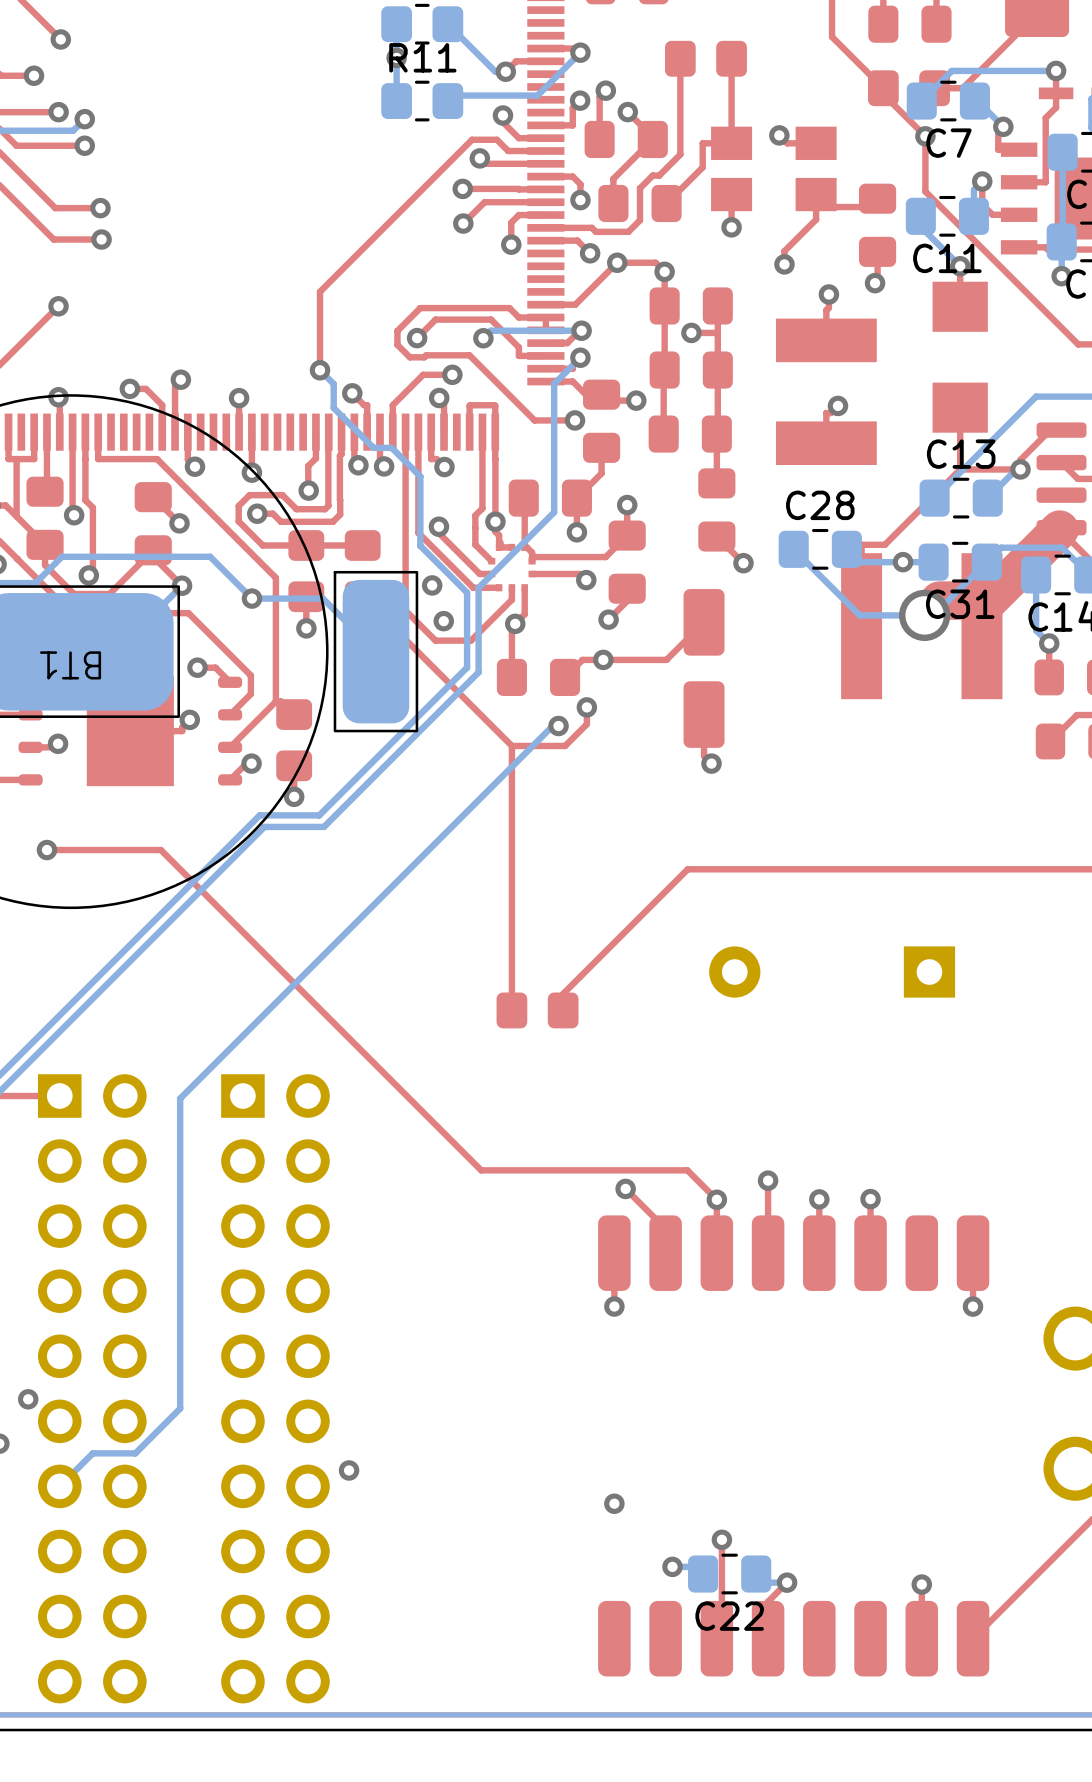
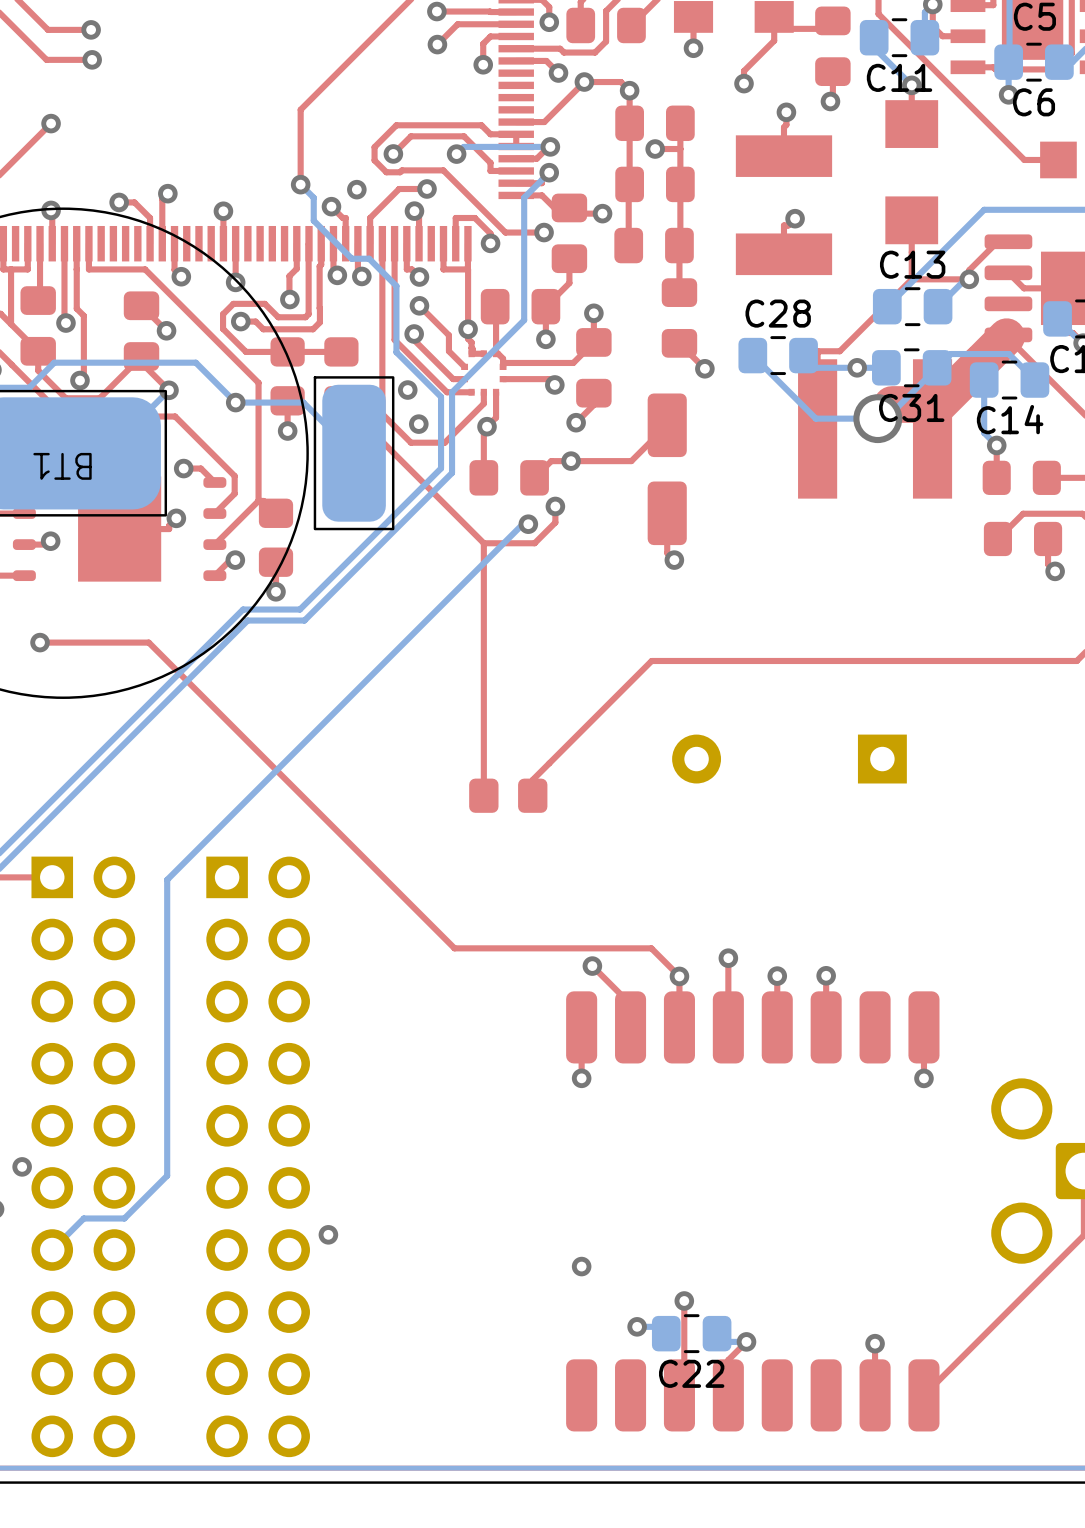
via: none -> (356, 189)
top track: none -> (490, 243) (490, 233) (474, 218) (455, 218) (455, 243)
via: none -> (490, 243)
top track: (482, 432) (482, 508) (475, 515) (475, 528) -> (419, 305) (448, 335)
top track: (495, 432) (494, 405) (469, 405) (469, 432) -> (467, 269) (443, 269) (443, 243)
via: none -> (419, 305)

